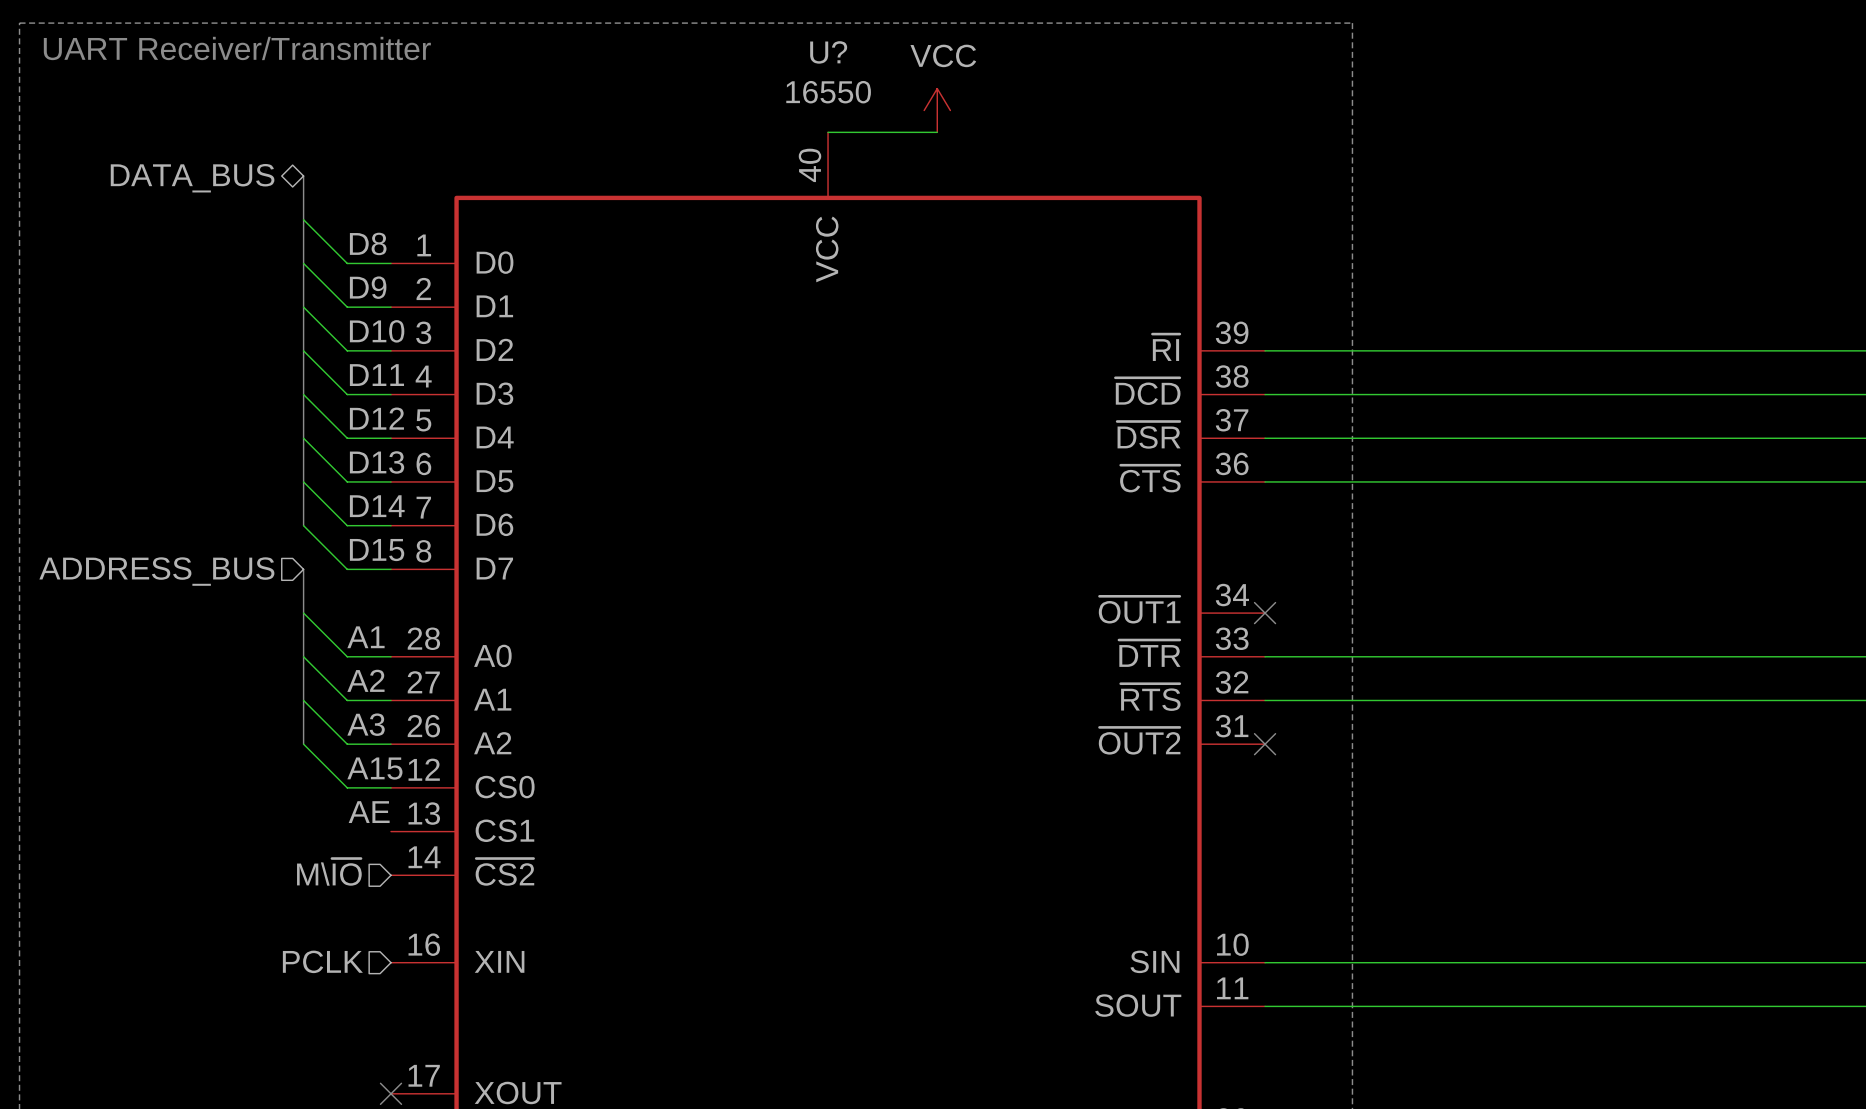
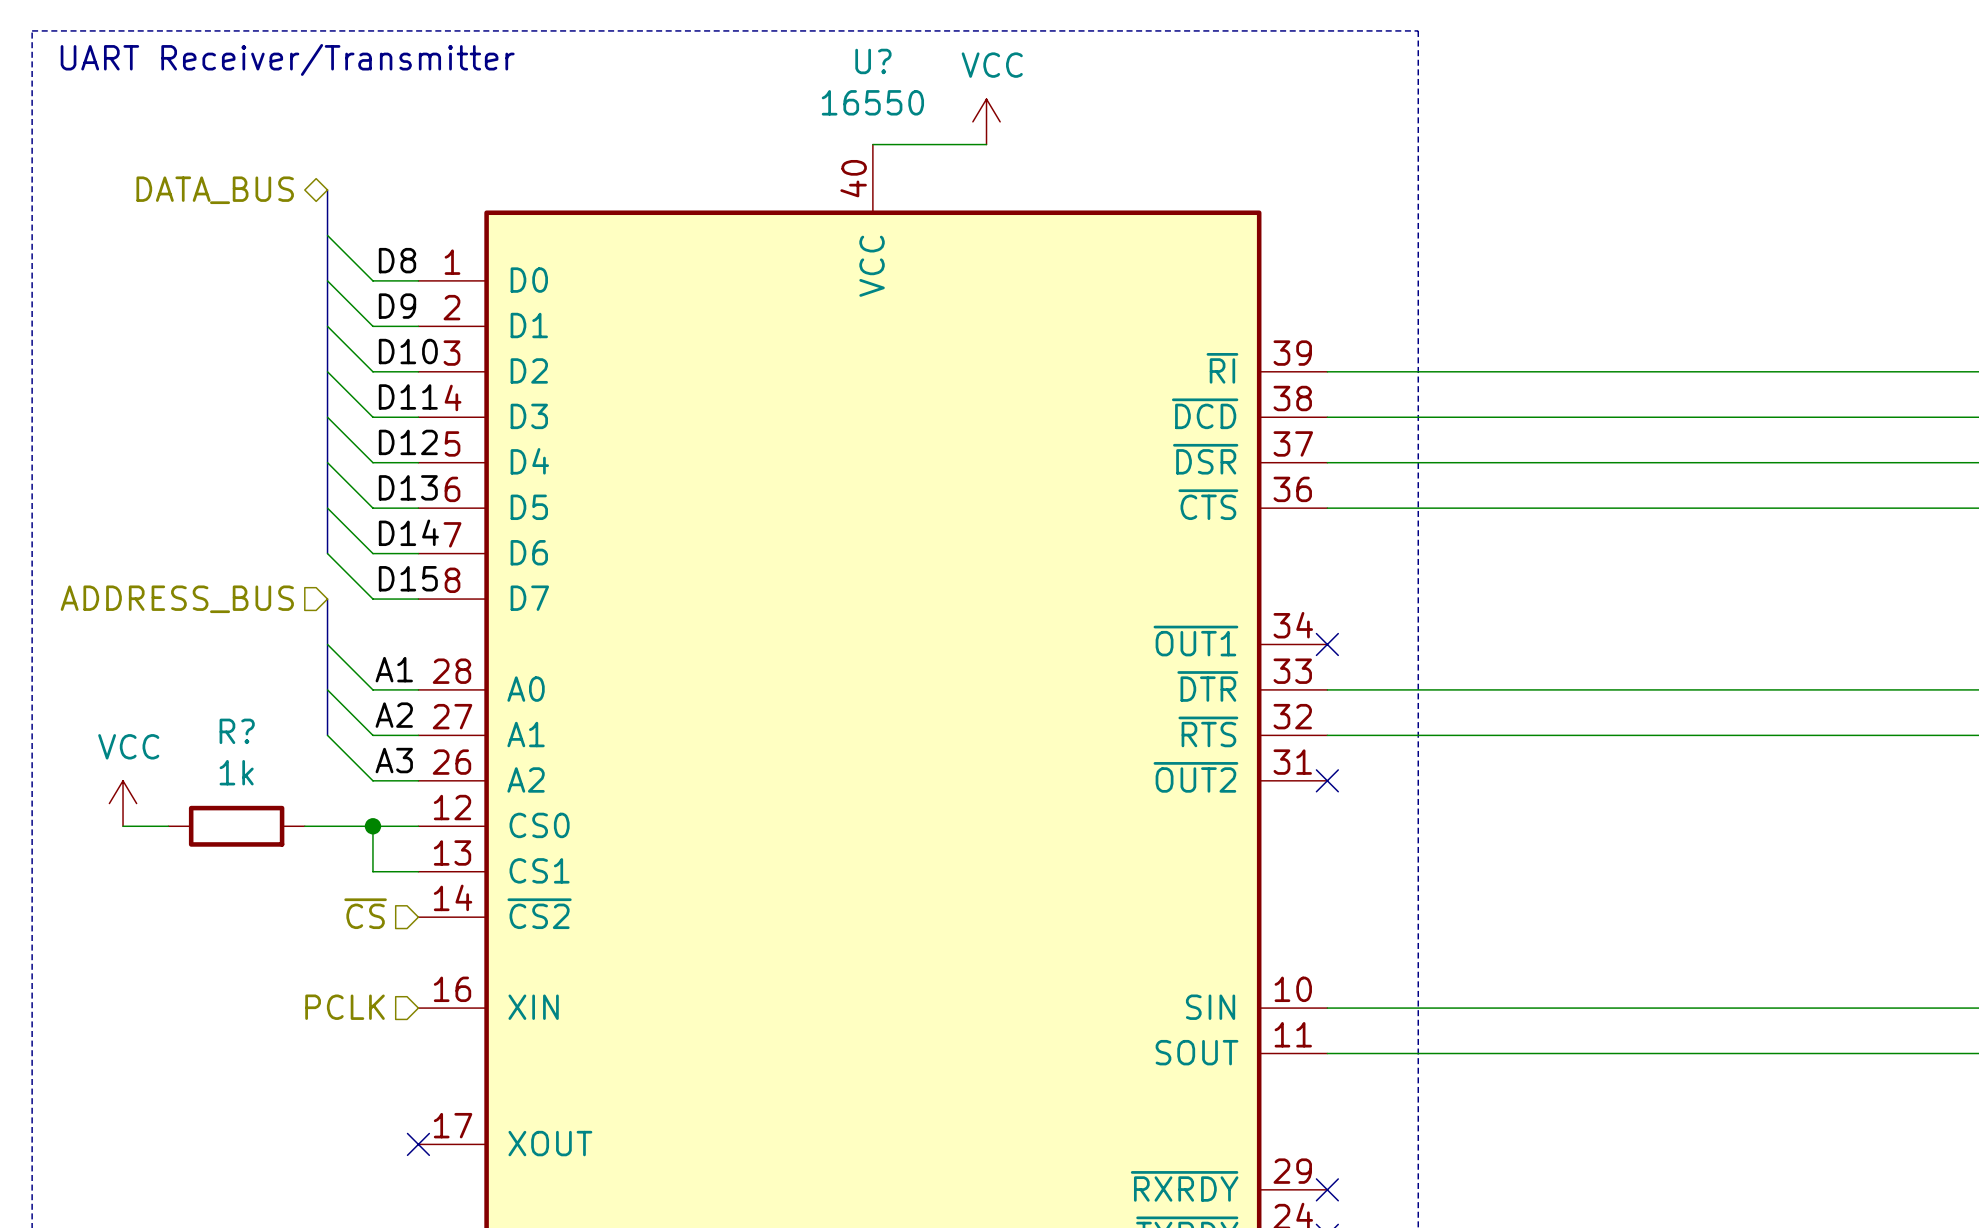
bus: (303, 700) (303, 744) -> none
wire: (303, 744) (347, 787) -> none
power symbol: none -> VCC (123, 803)
label: A15 (374, 768) -> none
wire: none -> (123, 826) (168, 826)
R?: none -> 1k (236, 826)
wire: none -> (304, 826) (372, 826) (372, 871) (418, 871)
junction: none -> (372, 826)
label: AE (369, 812) -> none
hierarchical label: M\~{IO} (329, 872) -> ~{CS} (365, 913)

